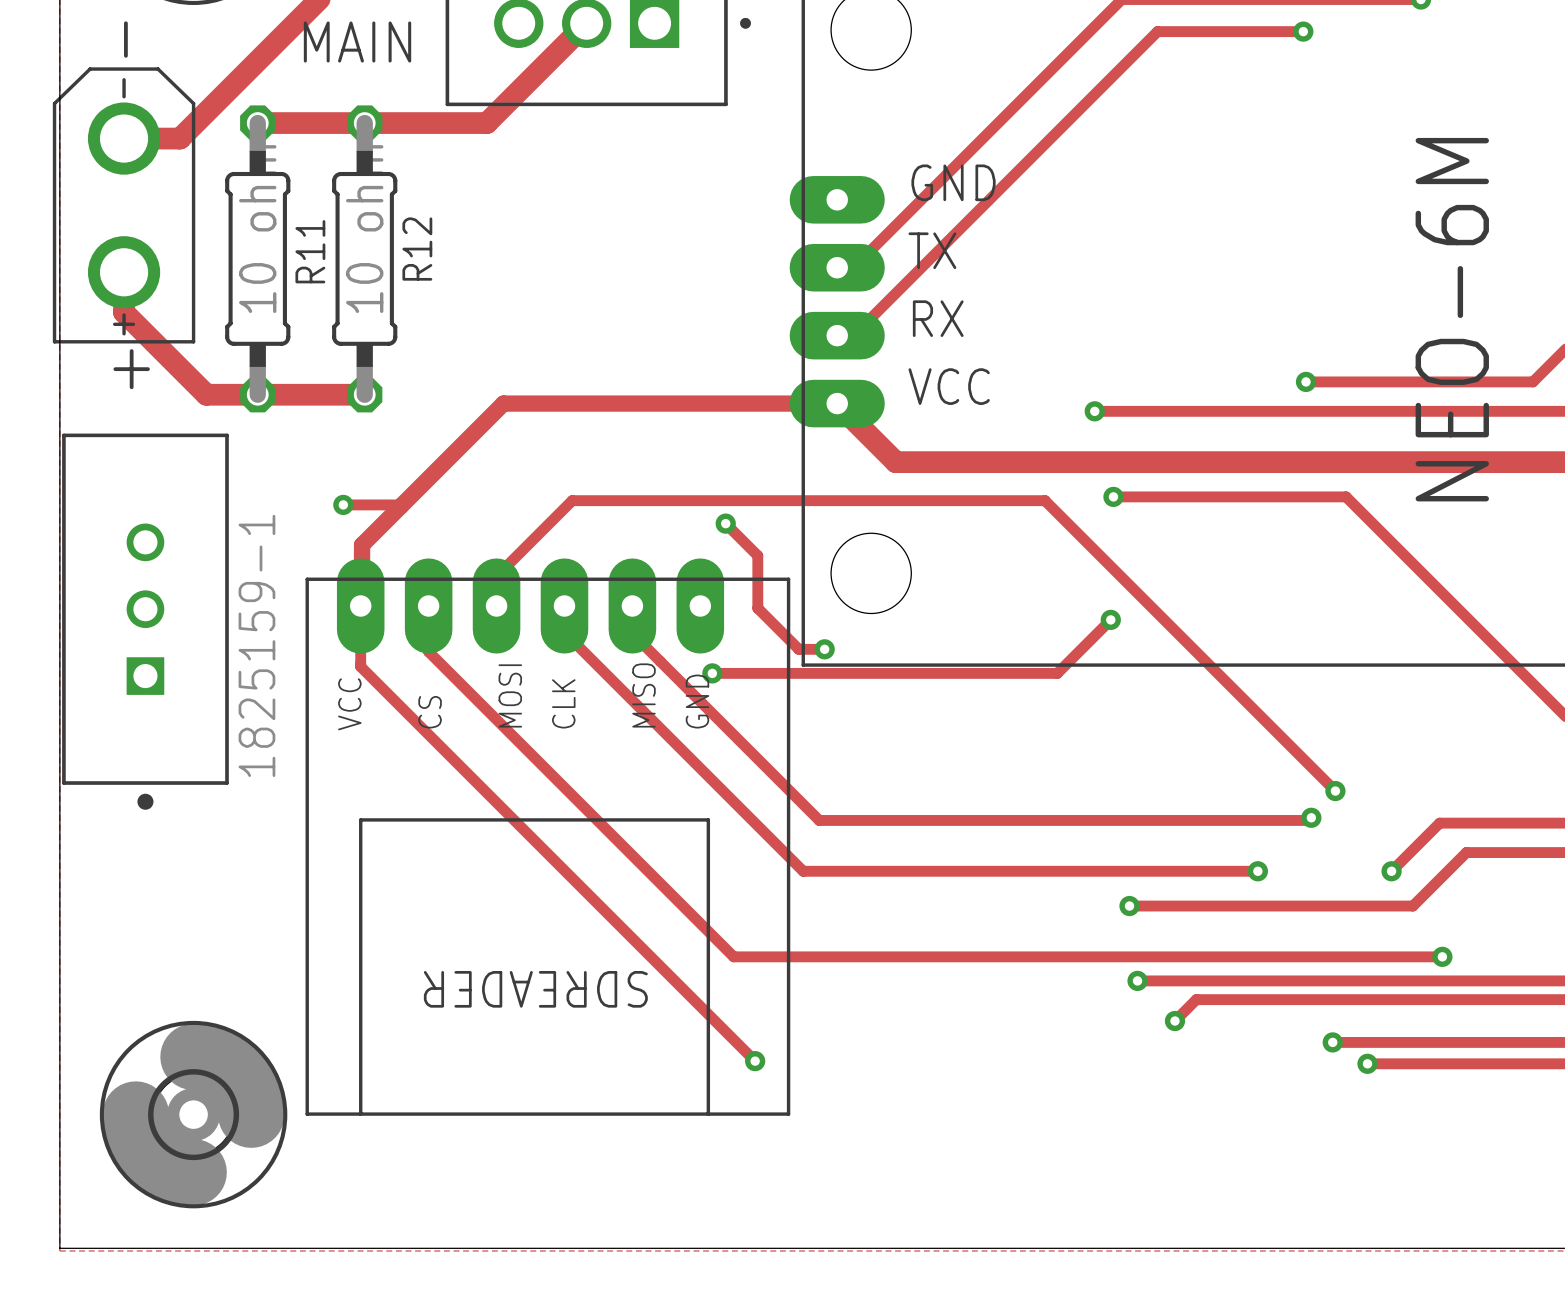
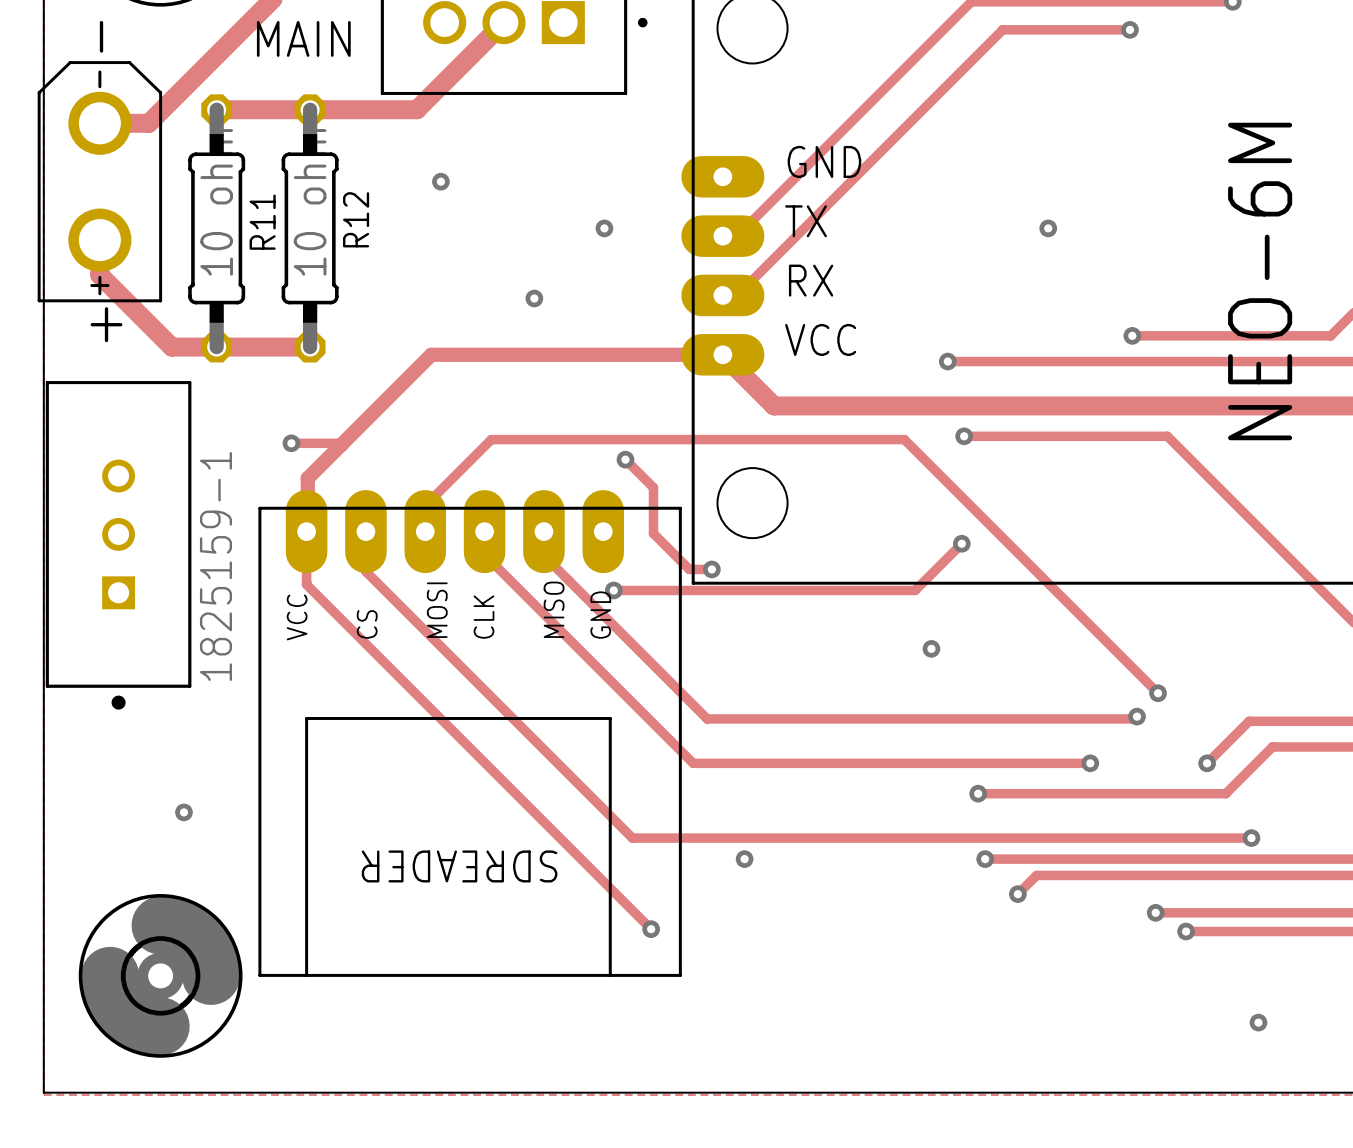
via: none -> (440, 181)
via: none -> (604, 228)
via: none -> (1048, 228)
via: none -> (534, 298)
via: none -> (931, 648)
via: none -> (183, 812)
via: none -> (744, 859)
via: none -> (1258, 1022)

